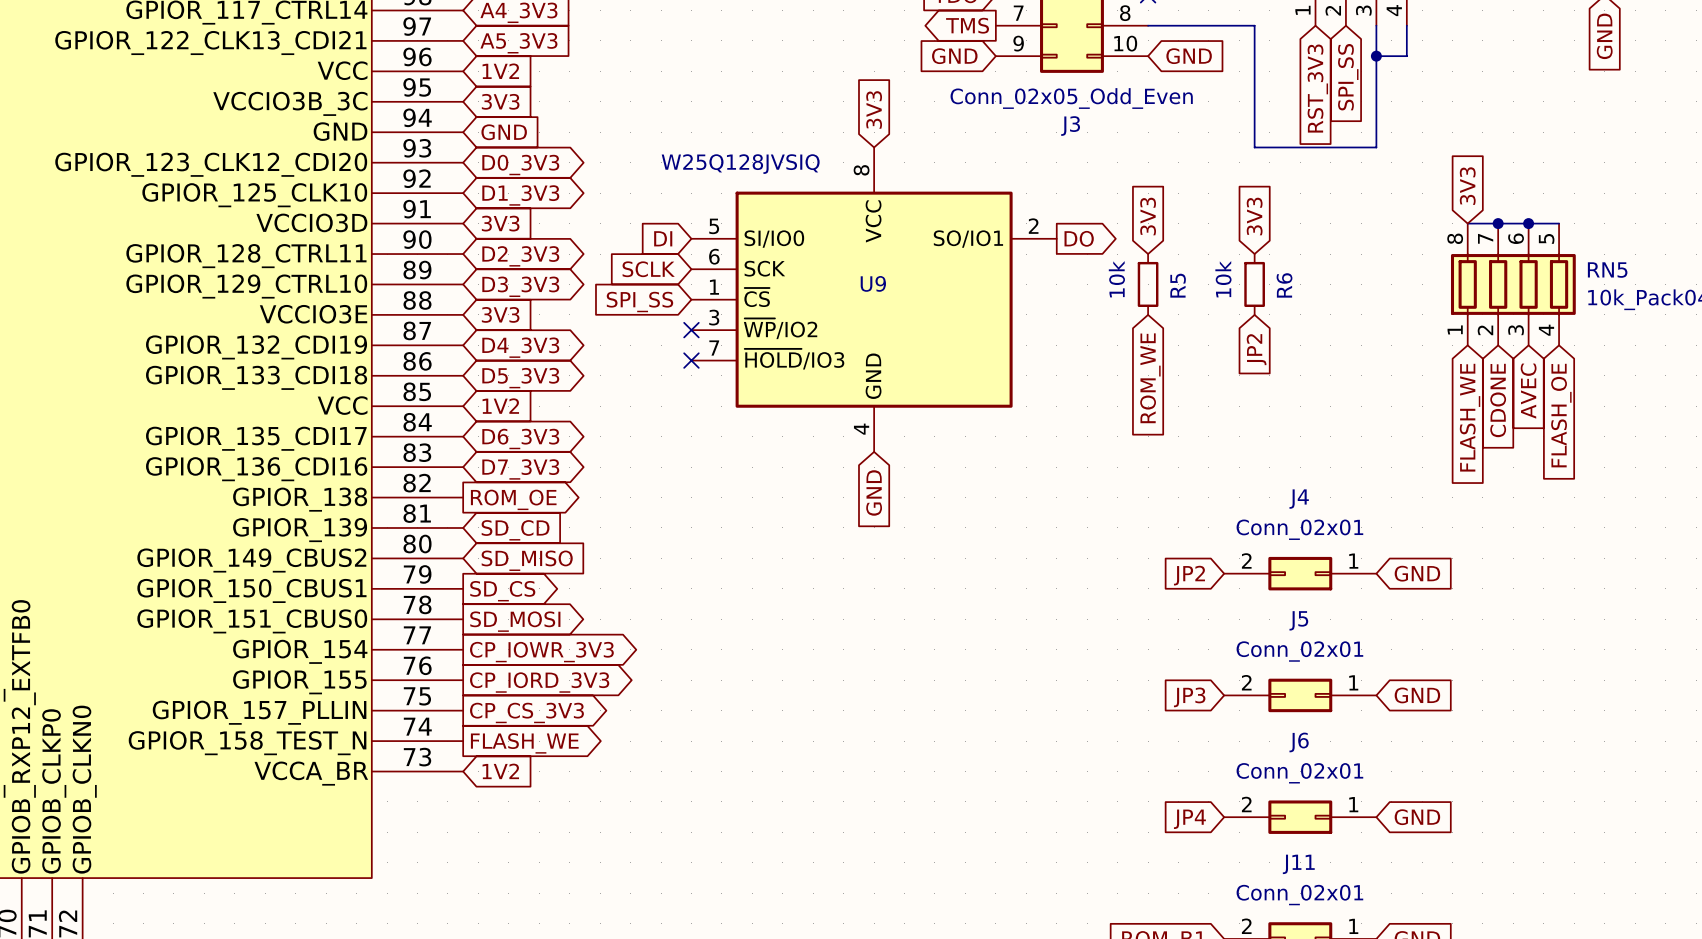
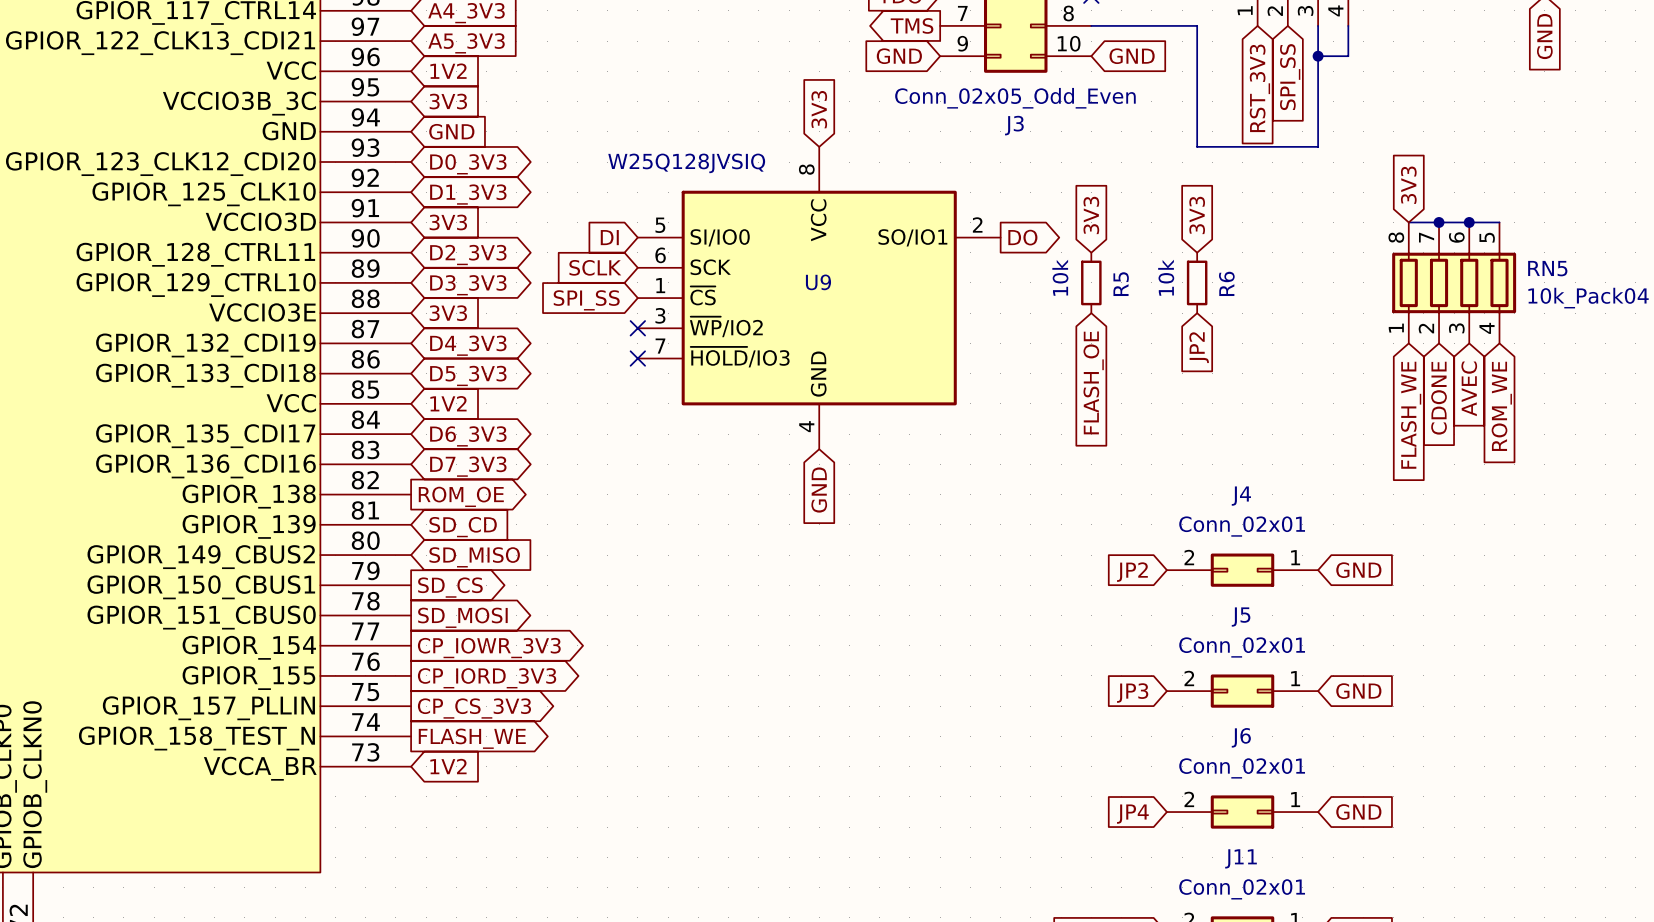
global label: ROM_WE (1150, 378) -> FLASH_OE (1093, 382)
global label: FLASH_OE (1561, 415) -> ROM_WE (1501, 406)

